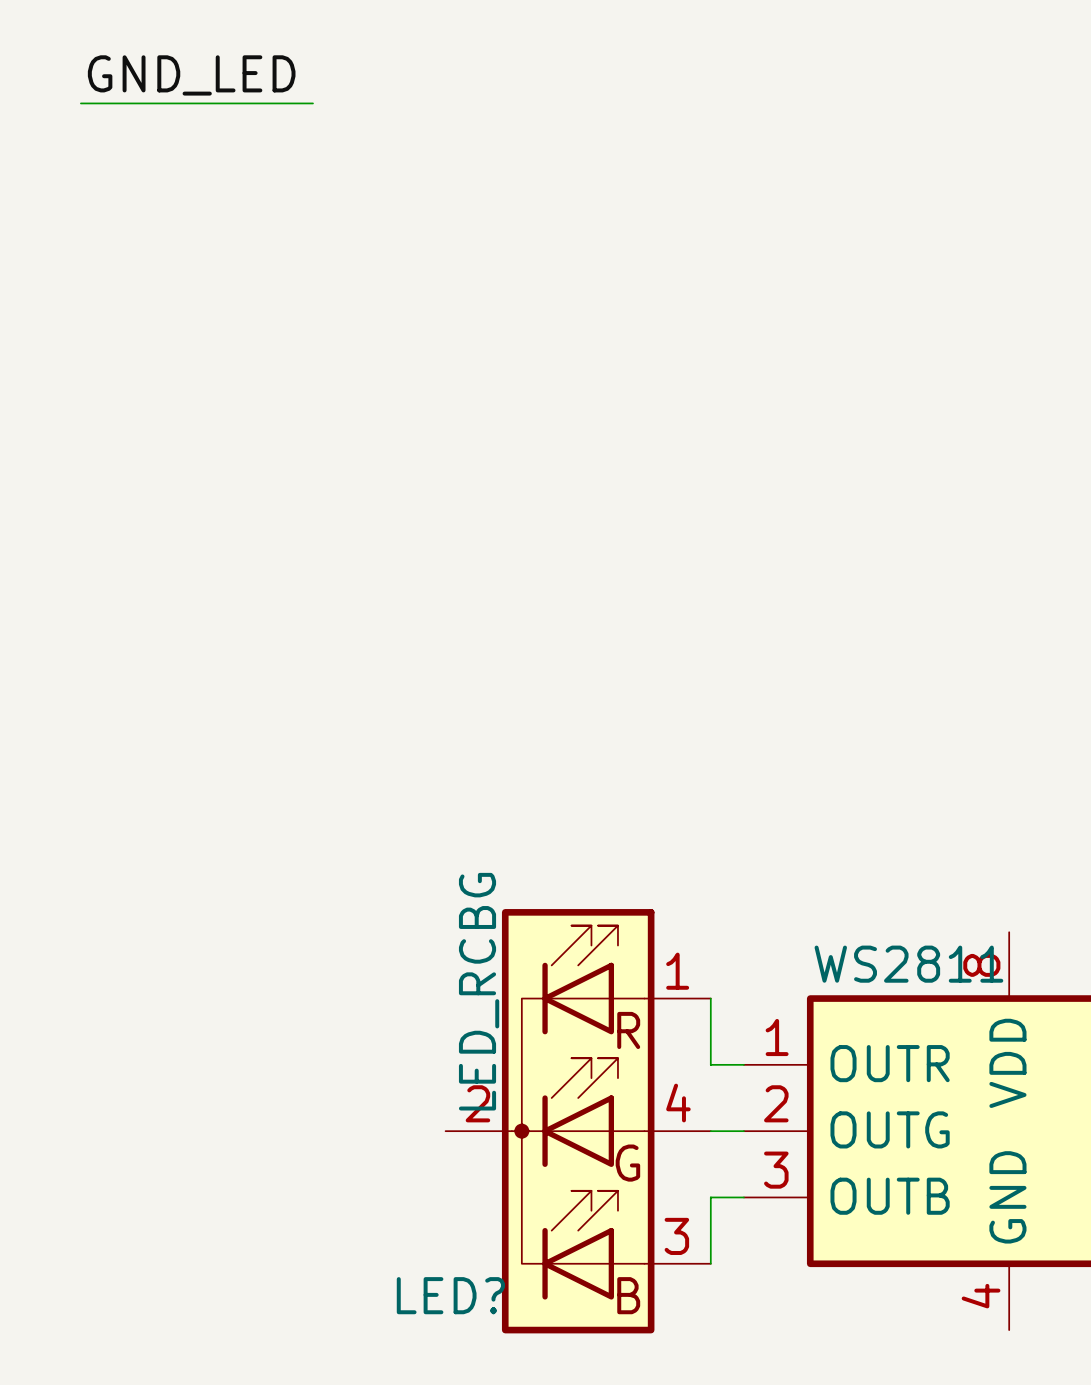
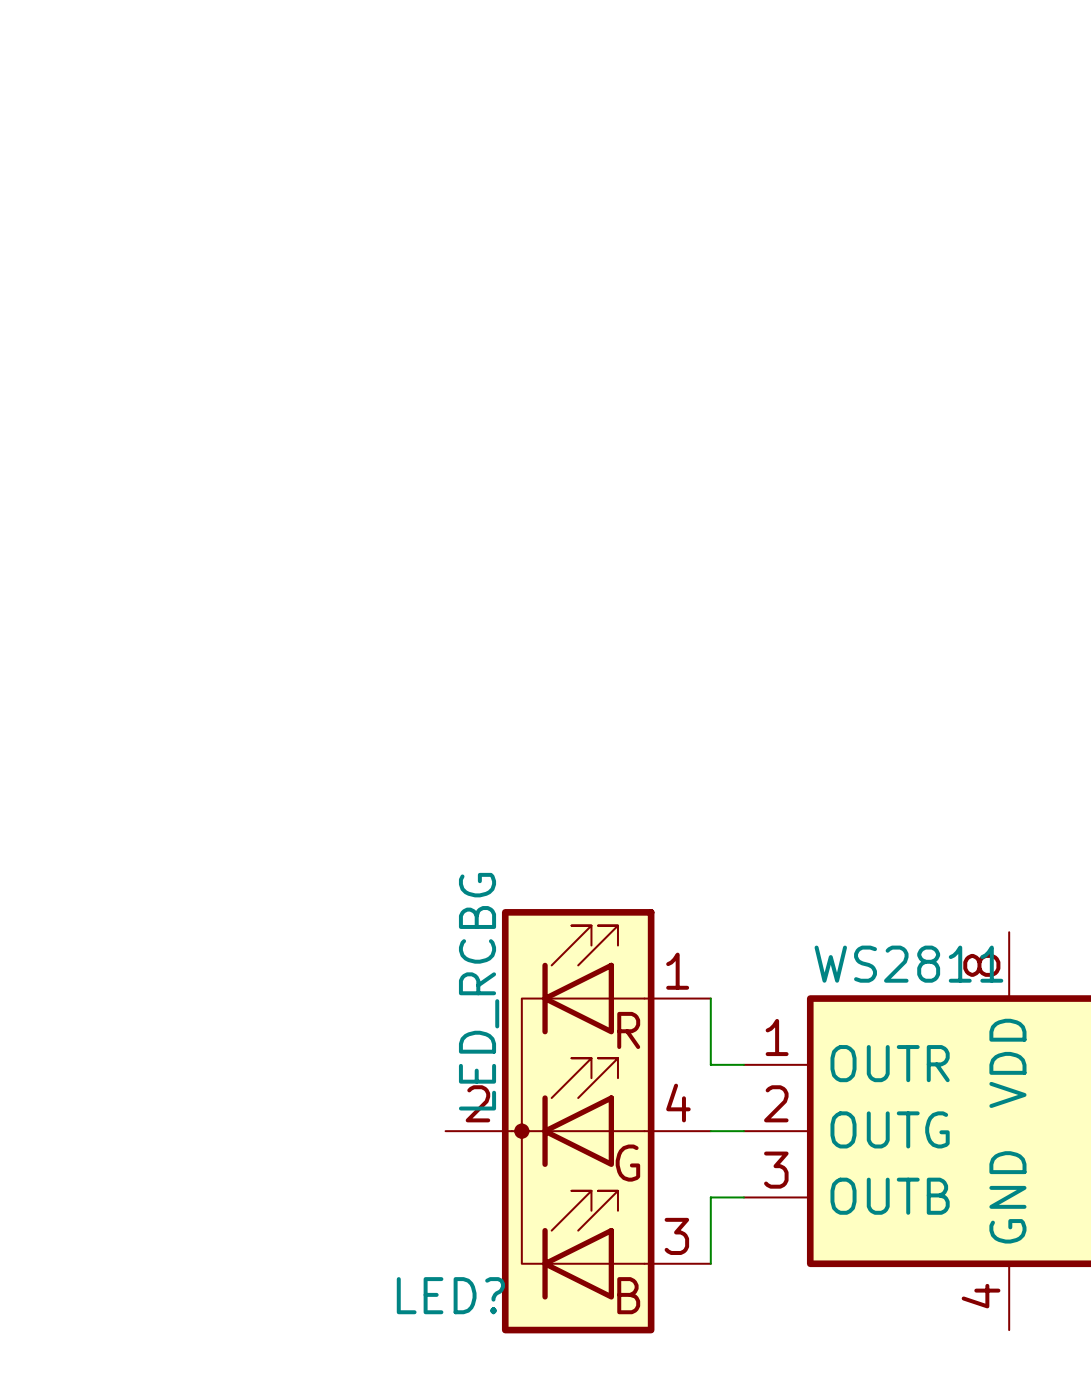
label: GND_LED (191, 75) -> none
wire: (80, 103) (312, 103) -> none

